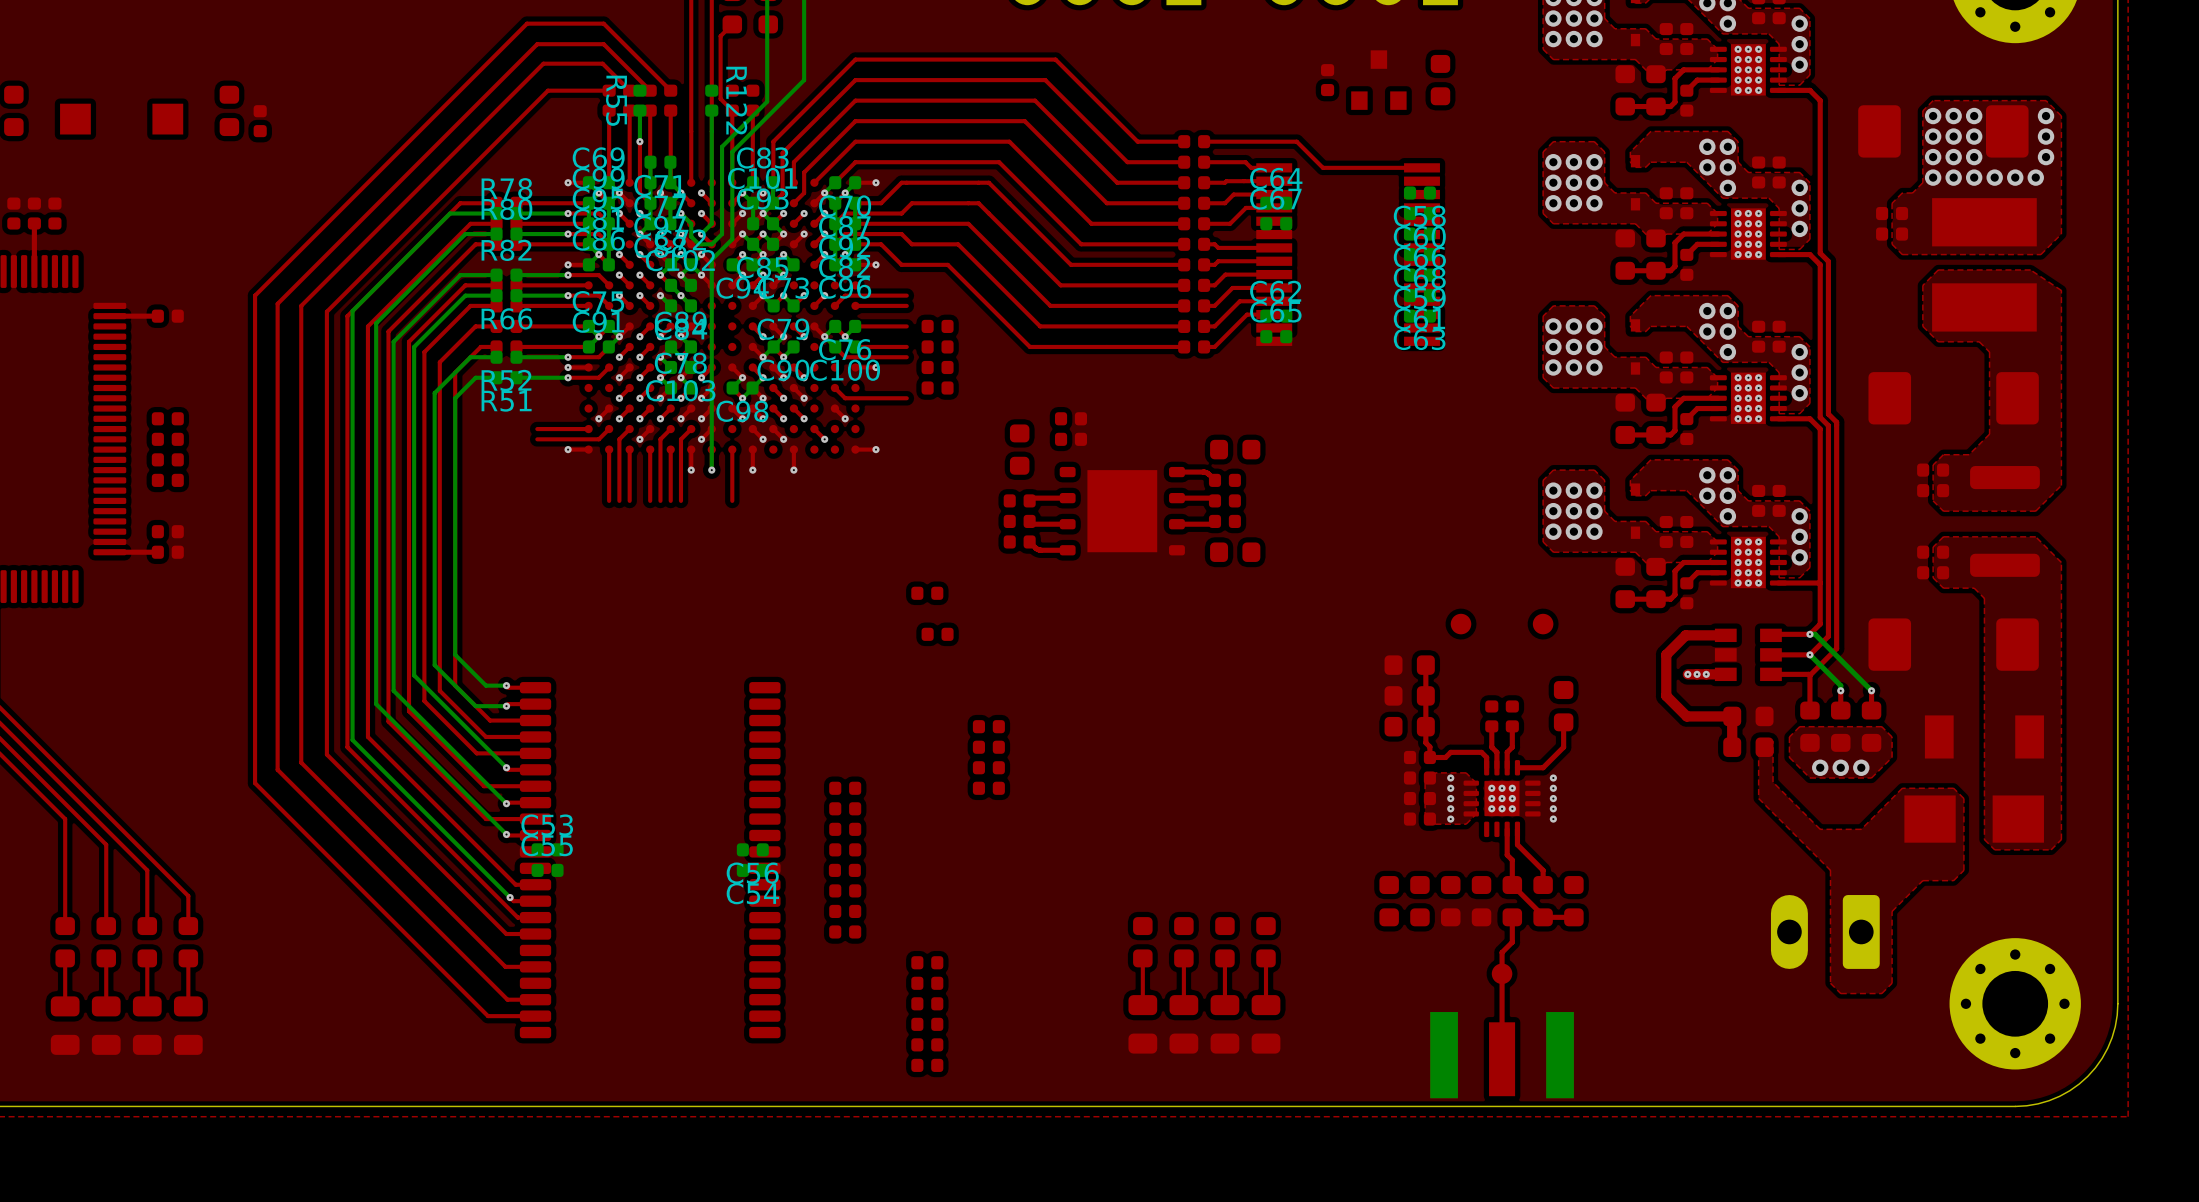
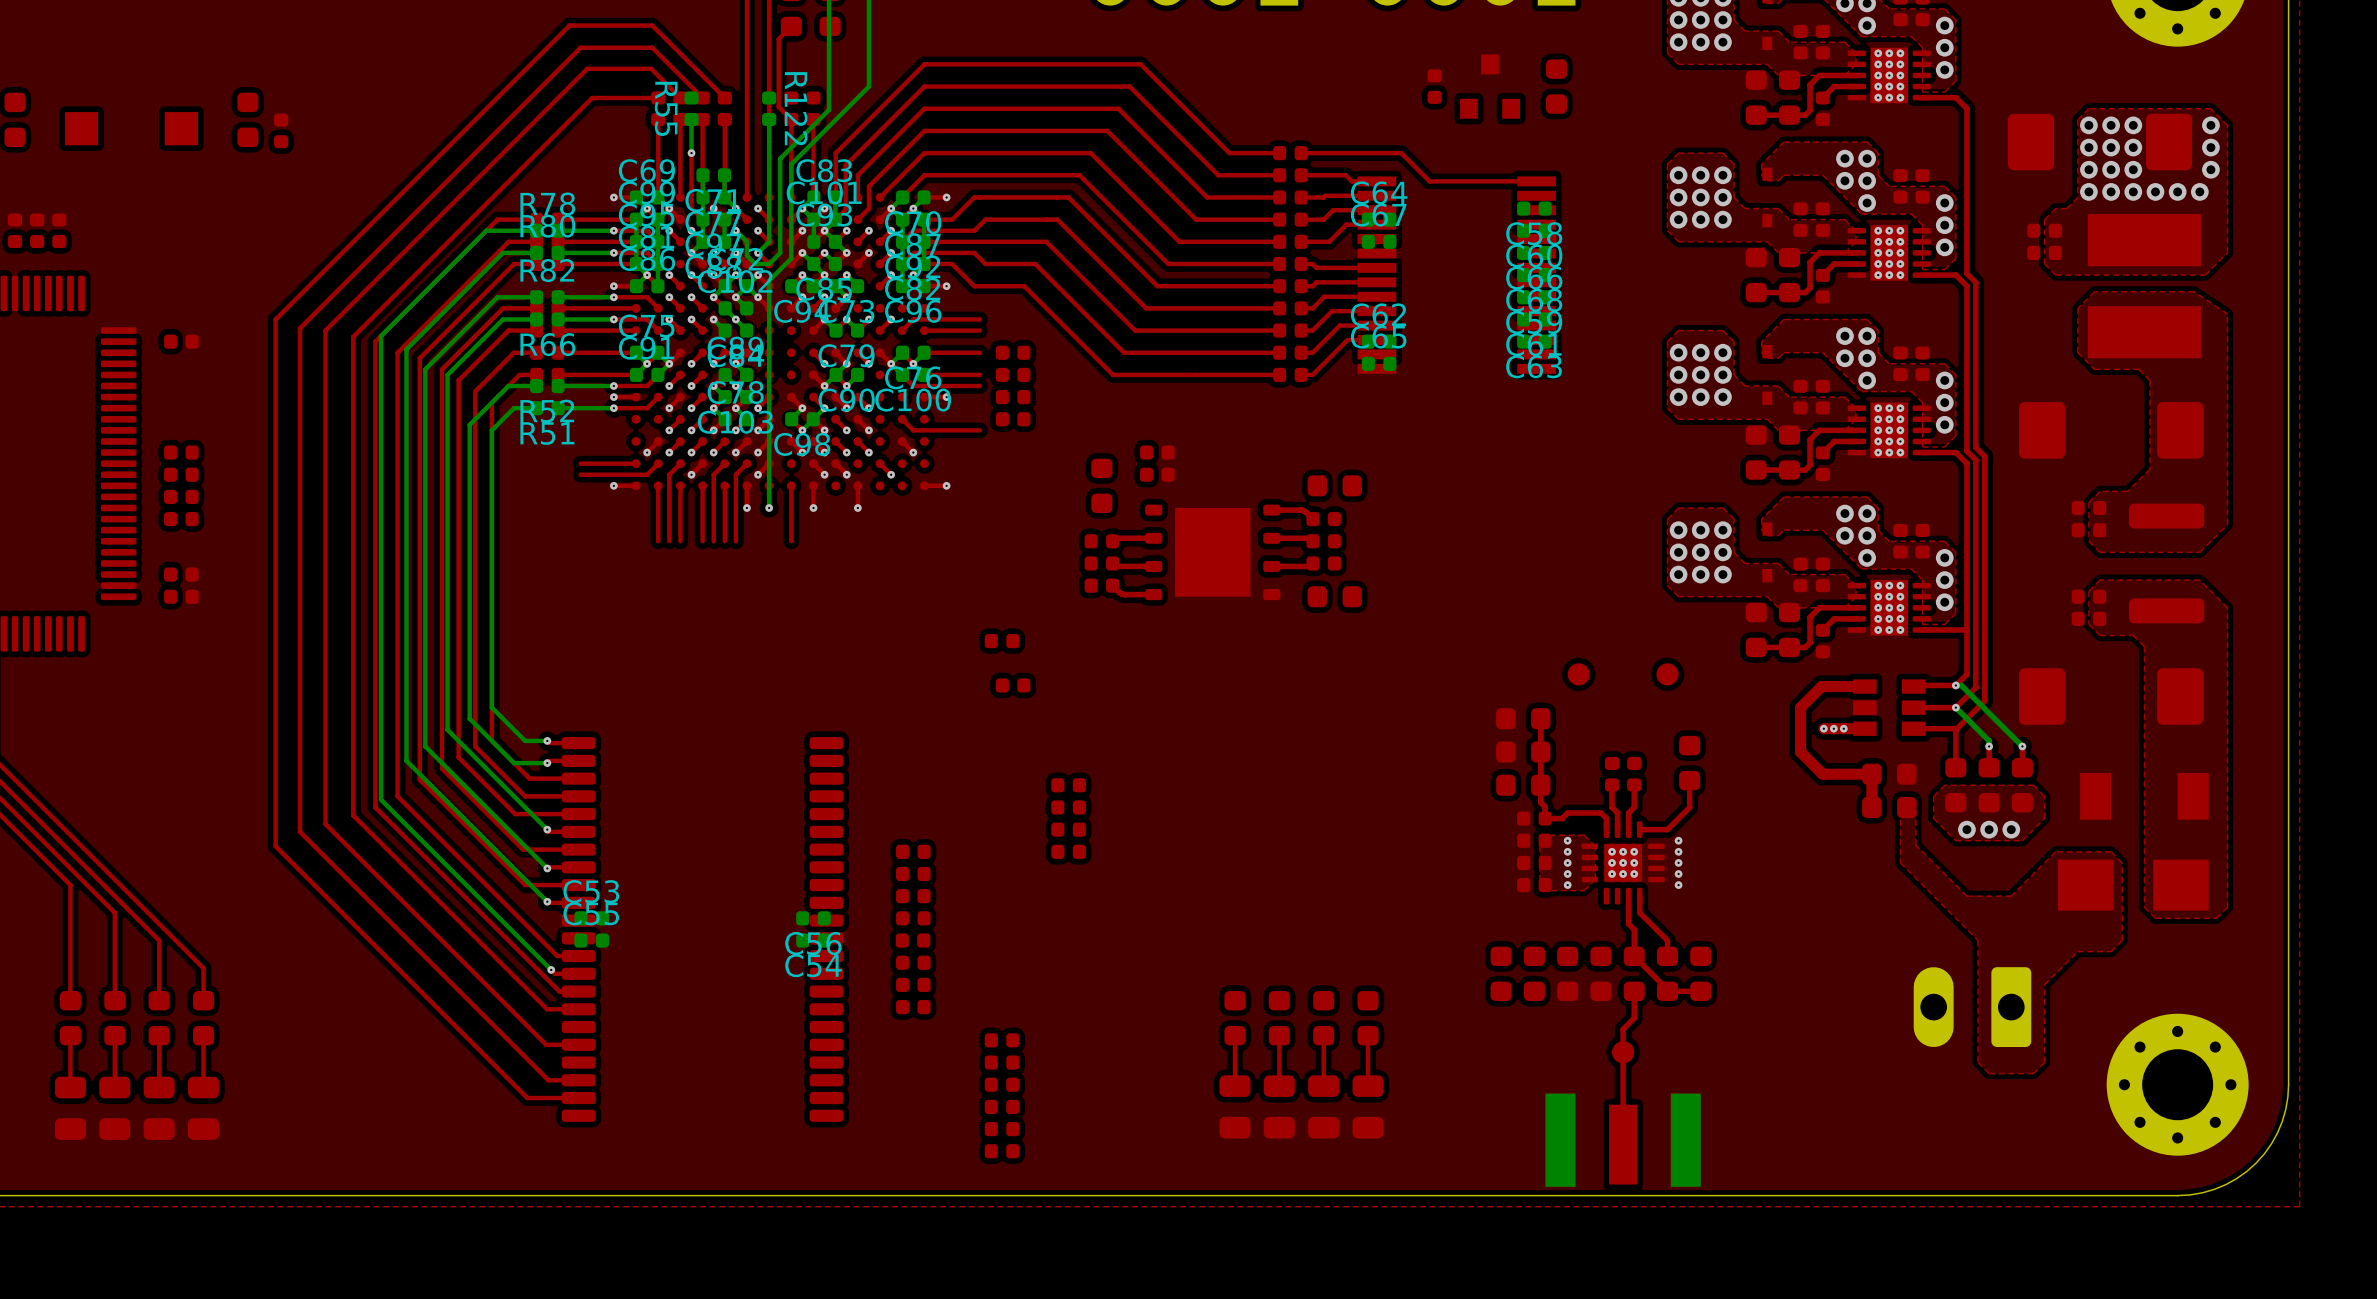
top track: (34, 223) (34, 271) -> none
top track: (157, 316) (109, 316) -> none
top track: (157, 552) (109, 552) -> none

